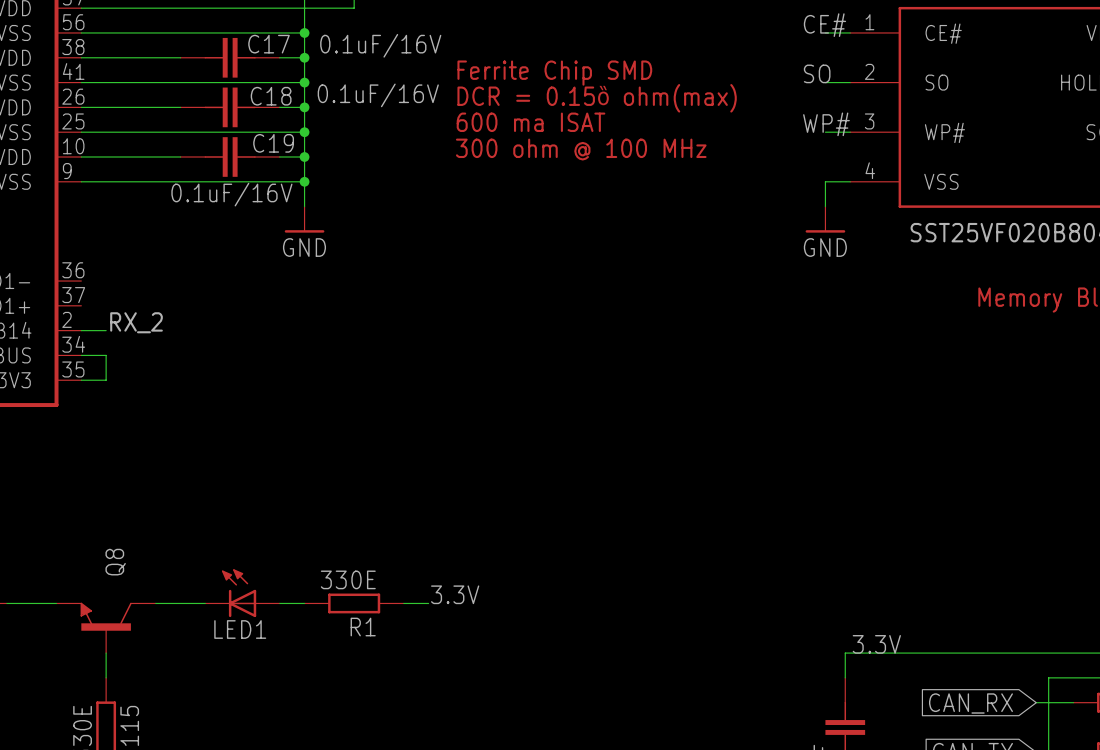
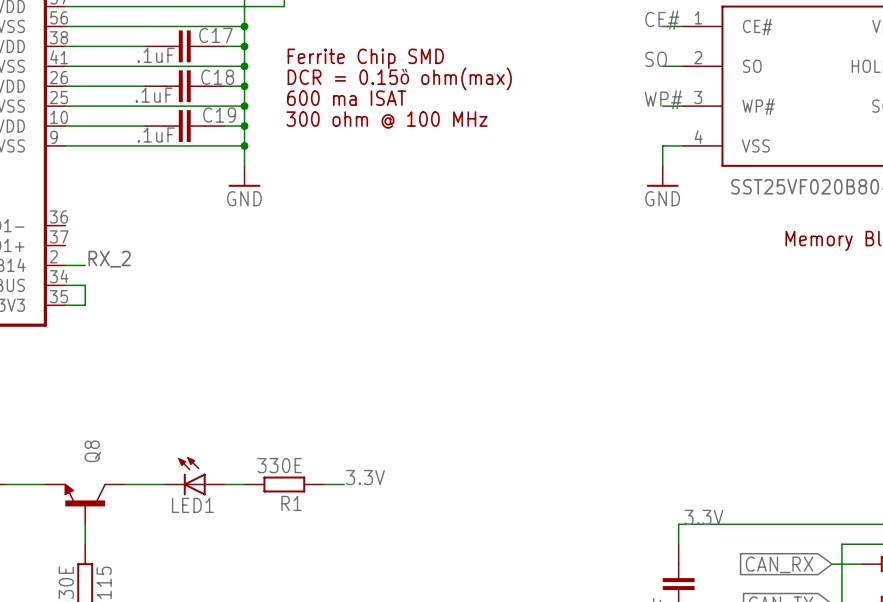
C17 value: 0.1uF/16V (380, 45) -> .1uF (156, 55)
text position: Ferrite Chip SMD (554, 73) -> Ferrite Chip SMD (365, 58)
C18 value: 0.1uF/16V (378, 95) -> .1uF (154, 95)
text position: DCR = 0.15ȍ ohm(max) (597, 98) -> DCR = 0.15ȍ ohm(max) (399, 78)
text position: 600 ma ISAT (531, 122) -> 600 ma ISAT (346, 98)
text position: 300 ohm @ 100 MHz (581, 149) -> 300 ohm @ 100 MHz (387, 120)
C19 value: 0.1uF/16V (231, 194) -> .1uF (156, 135)

